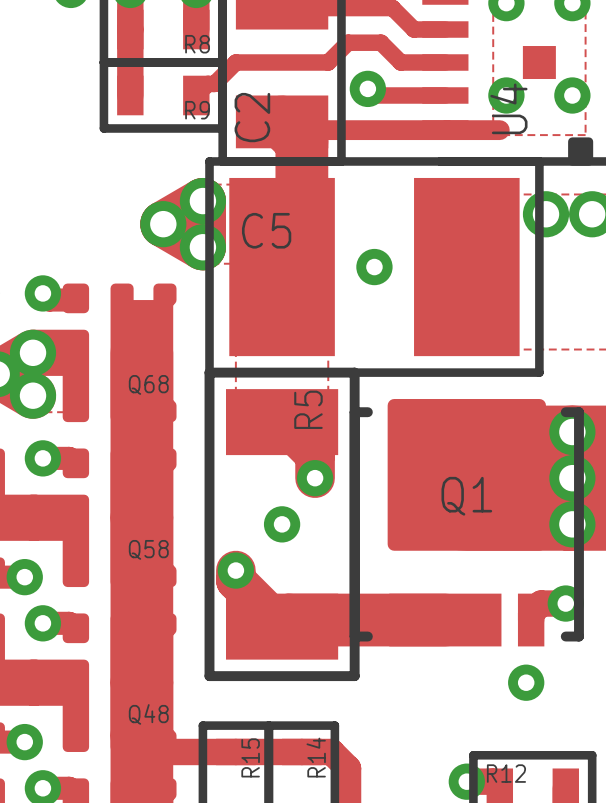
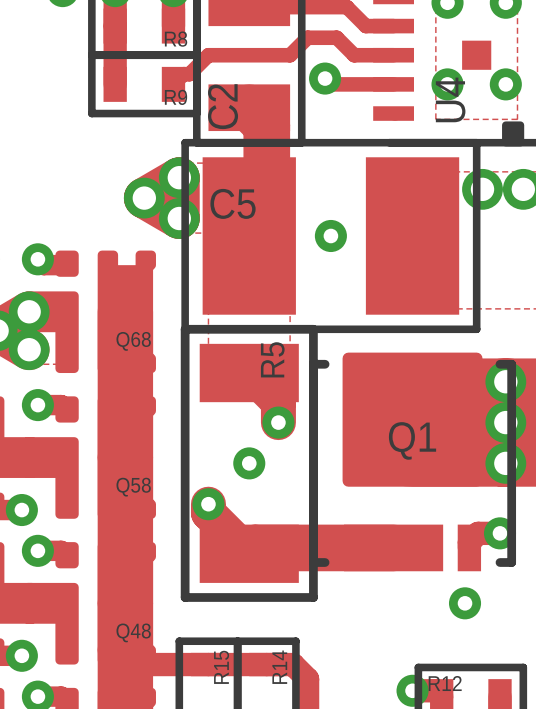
track: (282, 121) (290, 130) (499, 130) -> none

